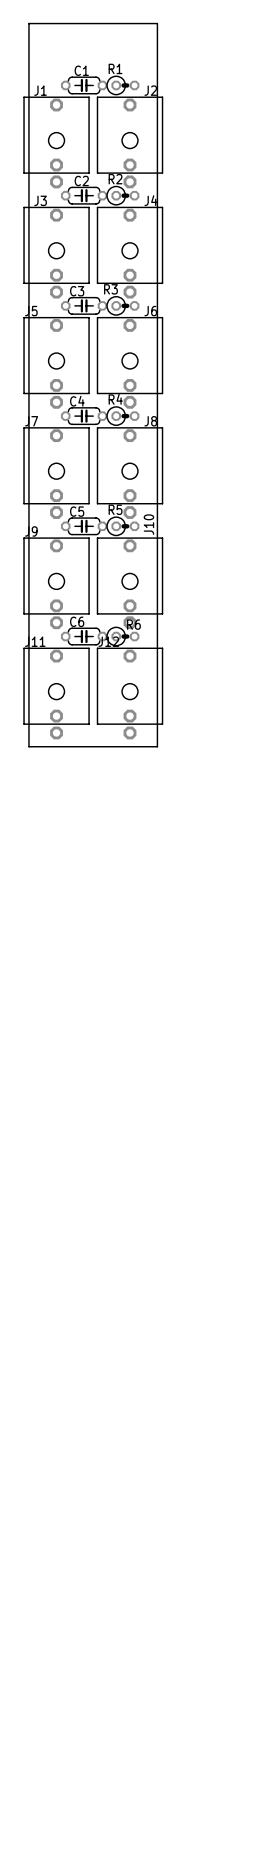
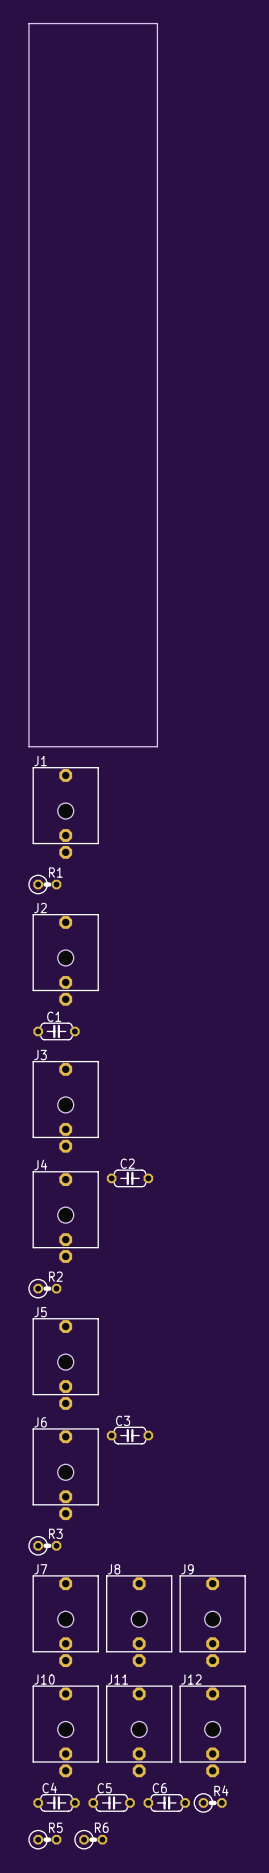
R1 name position: R1 (115, 68) -> R1 (55, 872)
C1 position: (84, 85) -> (56, 1031)
R1 position: (122, 85) -> (44, 884)
J1 name position: J1 (40, 90) -> J1 (40, 761)
J2 name position: J2 (150, 90) -> J2 (40, 908)
J1 position: (56, 142) -> (65, 813)
J2 position: (130, 142) -> (65, 959)
R2 name position: R2 (115, 179) -> R2 (55, 1276)
C2 position: (84, 195) -> (130, 1178)
R2 position: (122, 195) -> (44, 1288)
J3 name position: J3 (40, 200) -> J3 (40, 1054)
J4 name position: J4 (150, 200) -> J4 (40, 1164)
J3 position: (56, 252) -> (65, 1106)
J4 position: (130, 252) -> (65, 1217)
R3 name position: R3 (110, 289) -> R3 (55, 1533)
C3 position: (84, 305) -> (130, 1435)
R3 position: (122, 305) -> (44, 1545)
J6 name position: J6 (150, 311) -> J6 (40, 1422)
J5 position: (56, 362) -> (65, 1364)
J6 position: (130, 362) -> (65, 1474)
R4 name position: R4 (115, 399) -> R4 (221, 1790)
C4 position: (84, 416) -> (56, 1802)
R4 position: (122, 416) -> (210, 1802)
J8 name position: J8 (150, 421) -> J8 (114, 1569)
J7 position: (56, 473) -> (65, 1621)
J8 position: (130, 473) -> (139, 1621)
R5 name position: R5 (115, 509) -> R5 (55, 1827)
J10 name rotation: 0° (148, 524) -> 90° clockwise (44, 1679)
J10 name position: J10 (148, 524) -> J10 (44, 1679)
C5 position: (84, 526) -> (111, 1802)
R5 position: (122, 526) -> (44, 1839)
J9 position: (56, 583) -> (212, 1621)
J10 position: (130, 583) -> (65, 1731)
C6 position: (84, 636) -> (166, 1802)
R6 position: (122, 636) -> (90, 1839)
J11 position: (56, 693) -> (139, 1731)
J12 position: (130, 693) -> (212, 1731)

